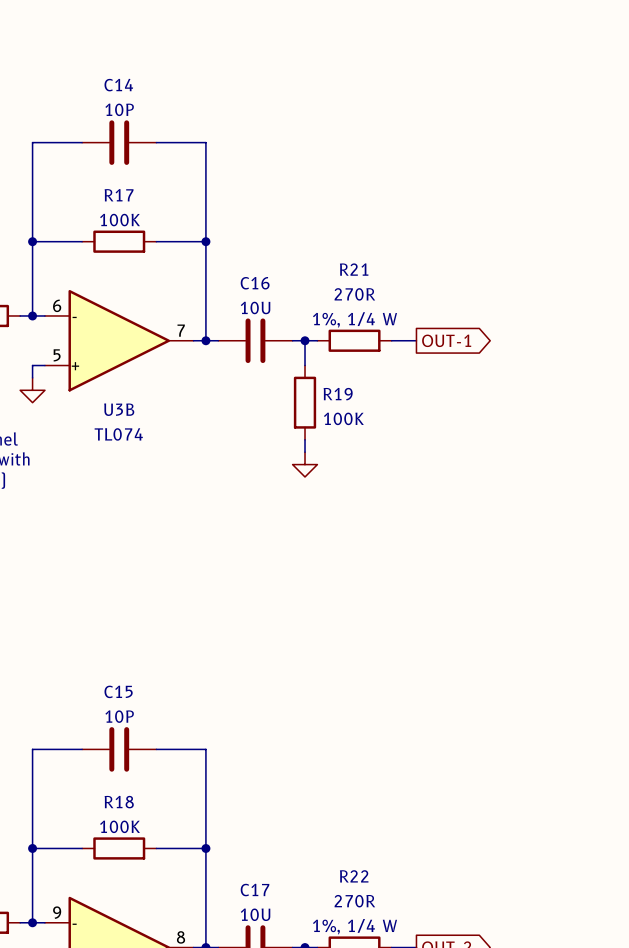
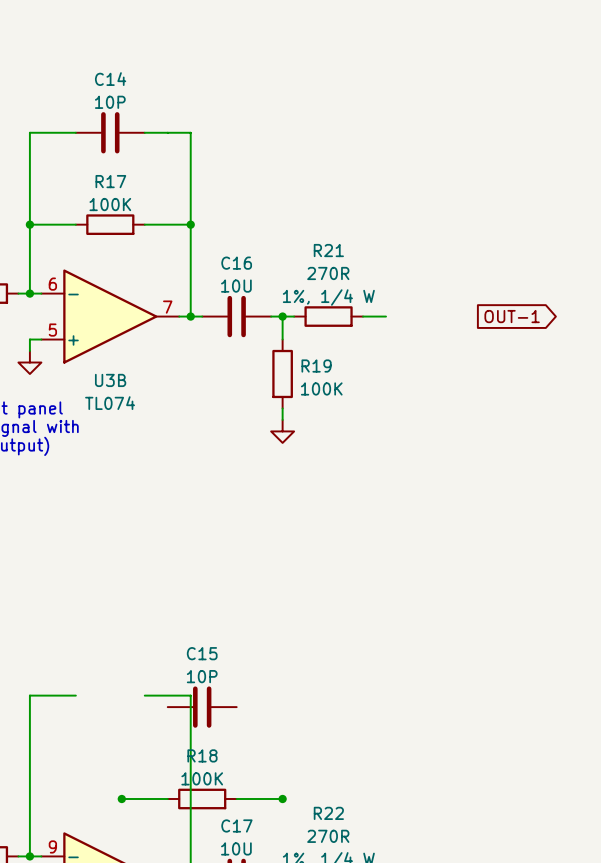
global label position: OUT-1 (446, 340) -> OUT-1 (512, 316)
C15 position: (119, 749) -> (202, 707)
wire: (32, 848) (82, 848) -> (121, 798) (167, 798)
junction: (32, 848) -> none
R18 position: (119, 848) -> (202, 798)
wire: (156, 848) (205, 848) -> (236, 798) (282, 798)
junction: (205, 848) -> none
junction: none -> (121, 798)
junction: none -> (282, 798)

